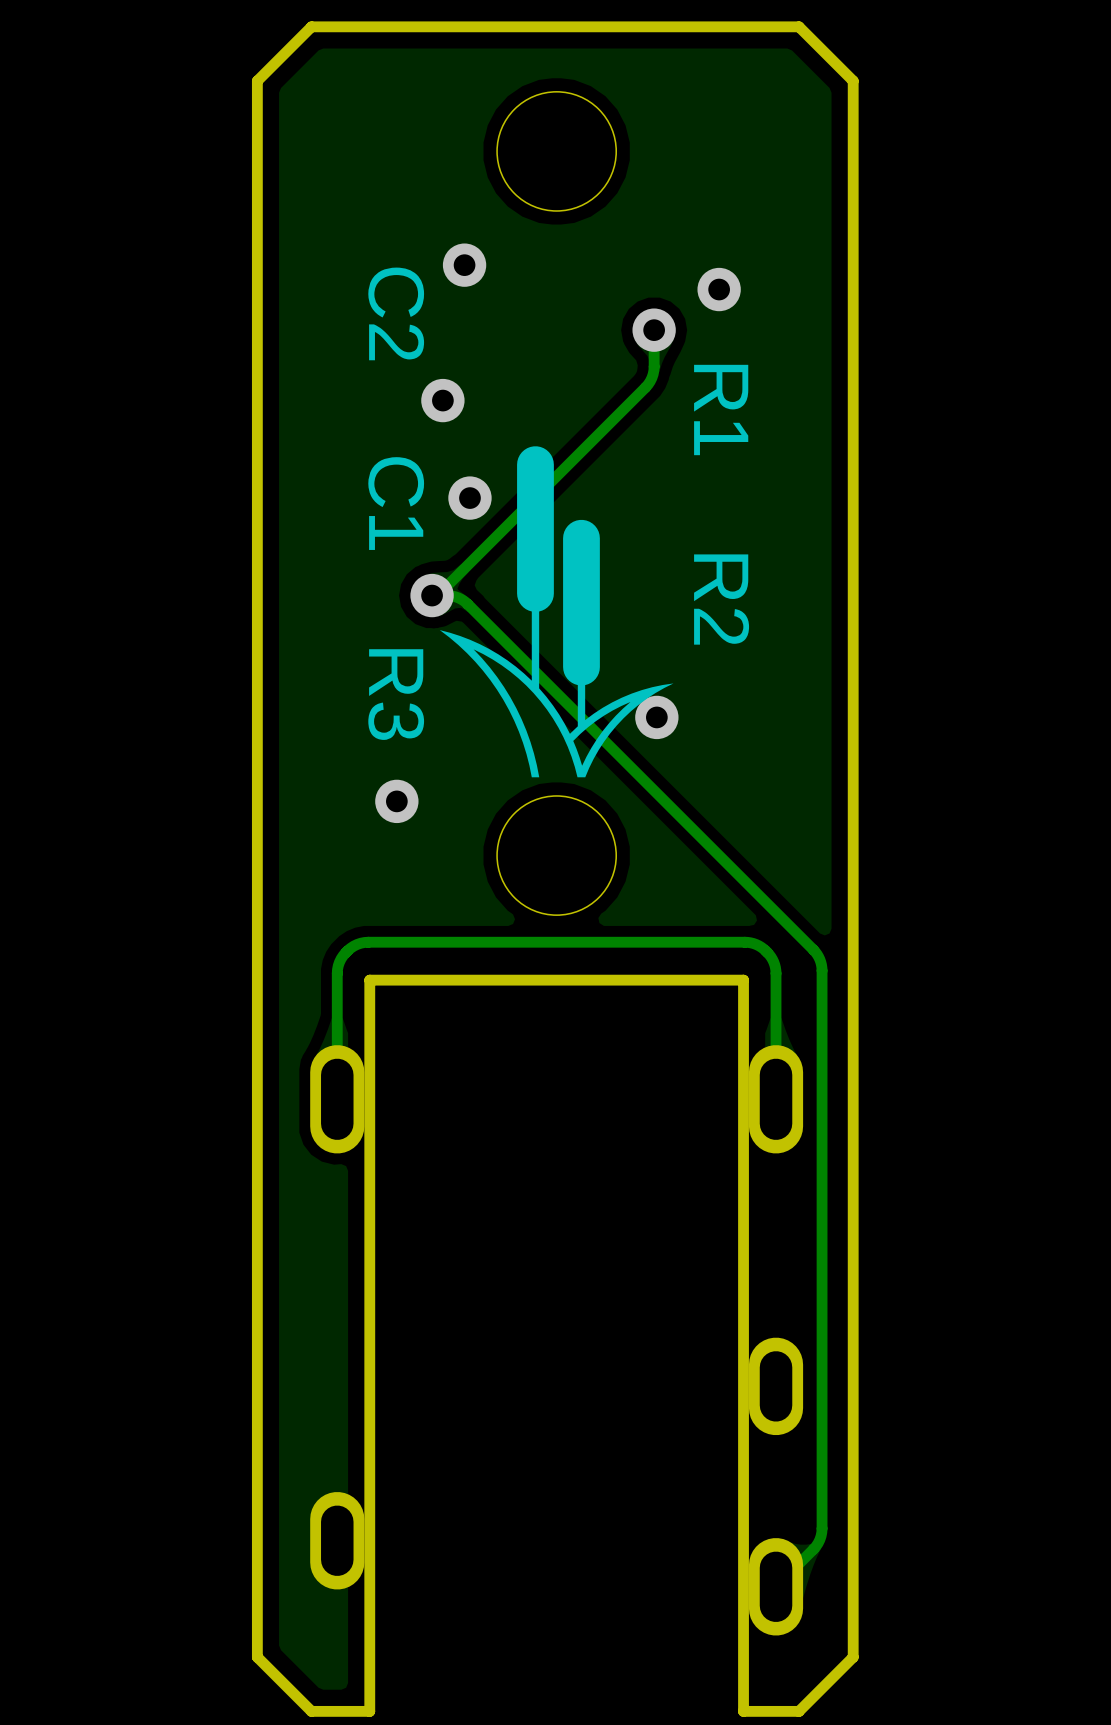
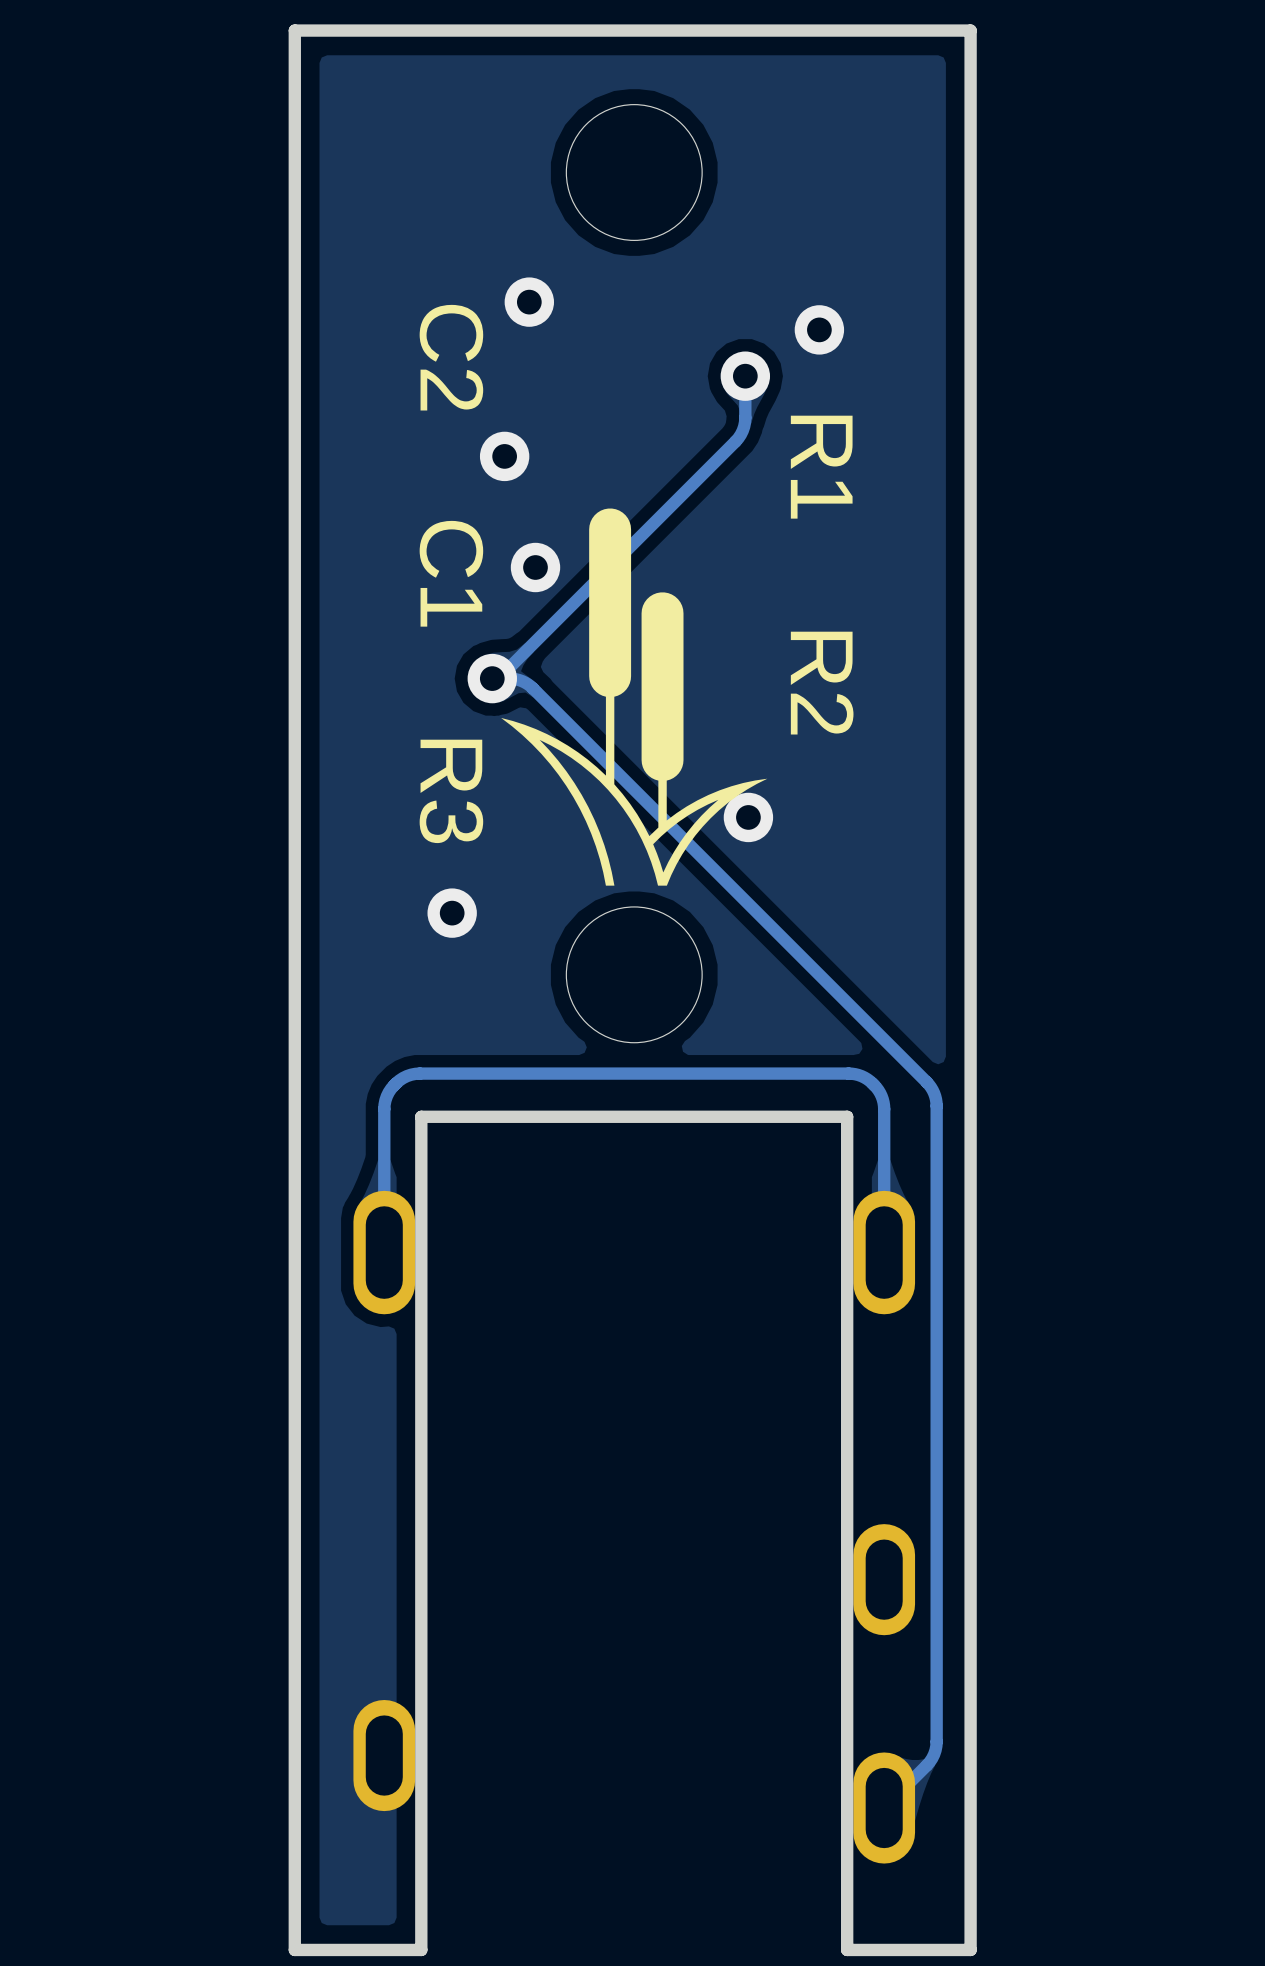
board edge: (311, 26) (257, 80) (257, 1657) (311, 1711) -> (354, 30) (294, 30) (294, 1949) (354, 1949)
board edge: (799, 26) (853, 80) (853, 1657) (799, 1711) -> (910, 30) (970, 30) (970, 1949) (910, 1949)

